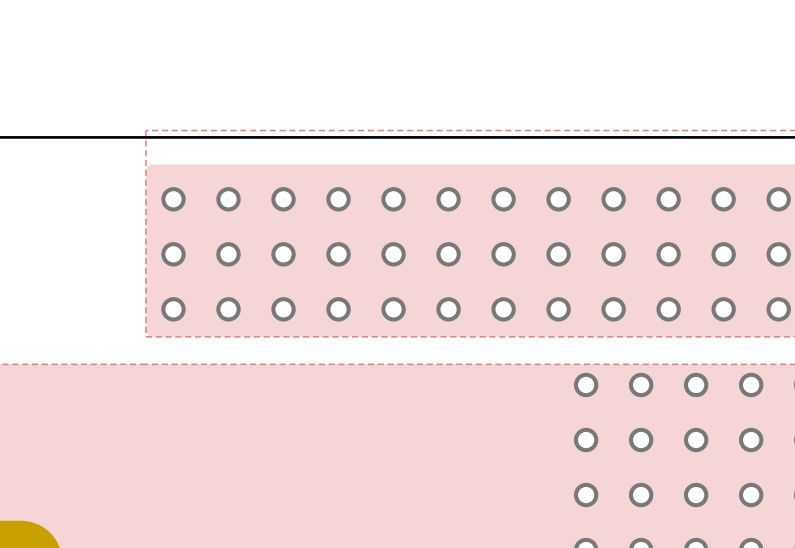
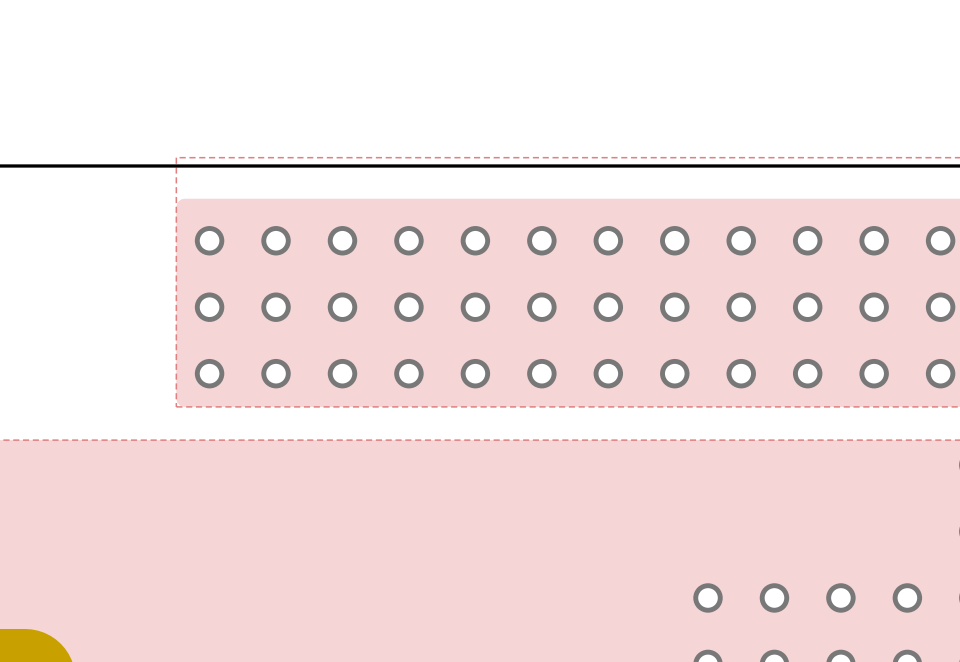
via: (586, 384) -> none
via: (641, 384) -> none
via: (696, 384) -> none
via: (751, 384) -> none
via: (586, 440) -> none
via: (641, 440) -> none
via: (696, 440) -> none
via: (751, 440) -> none

